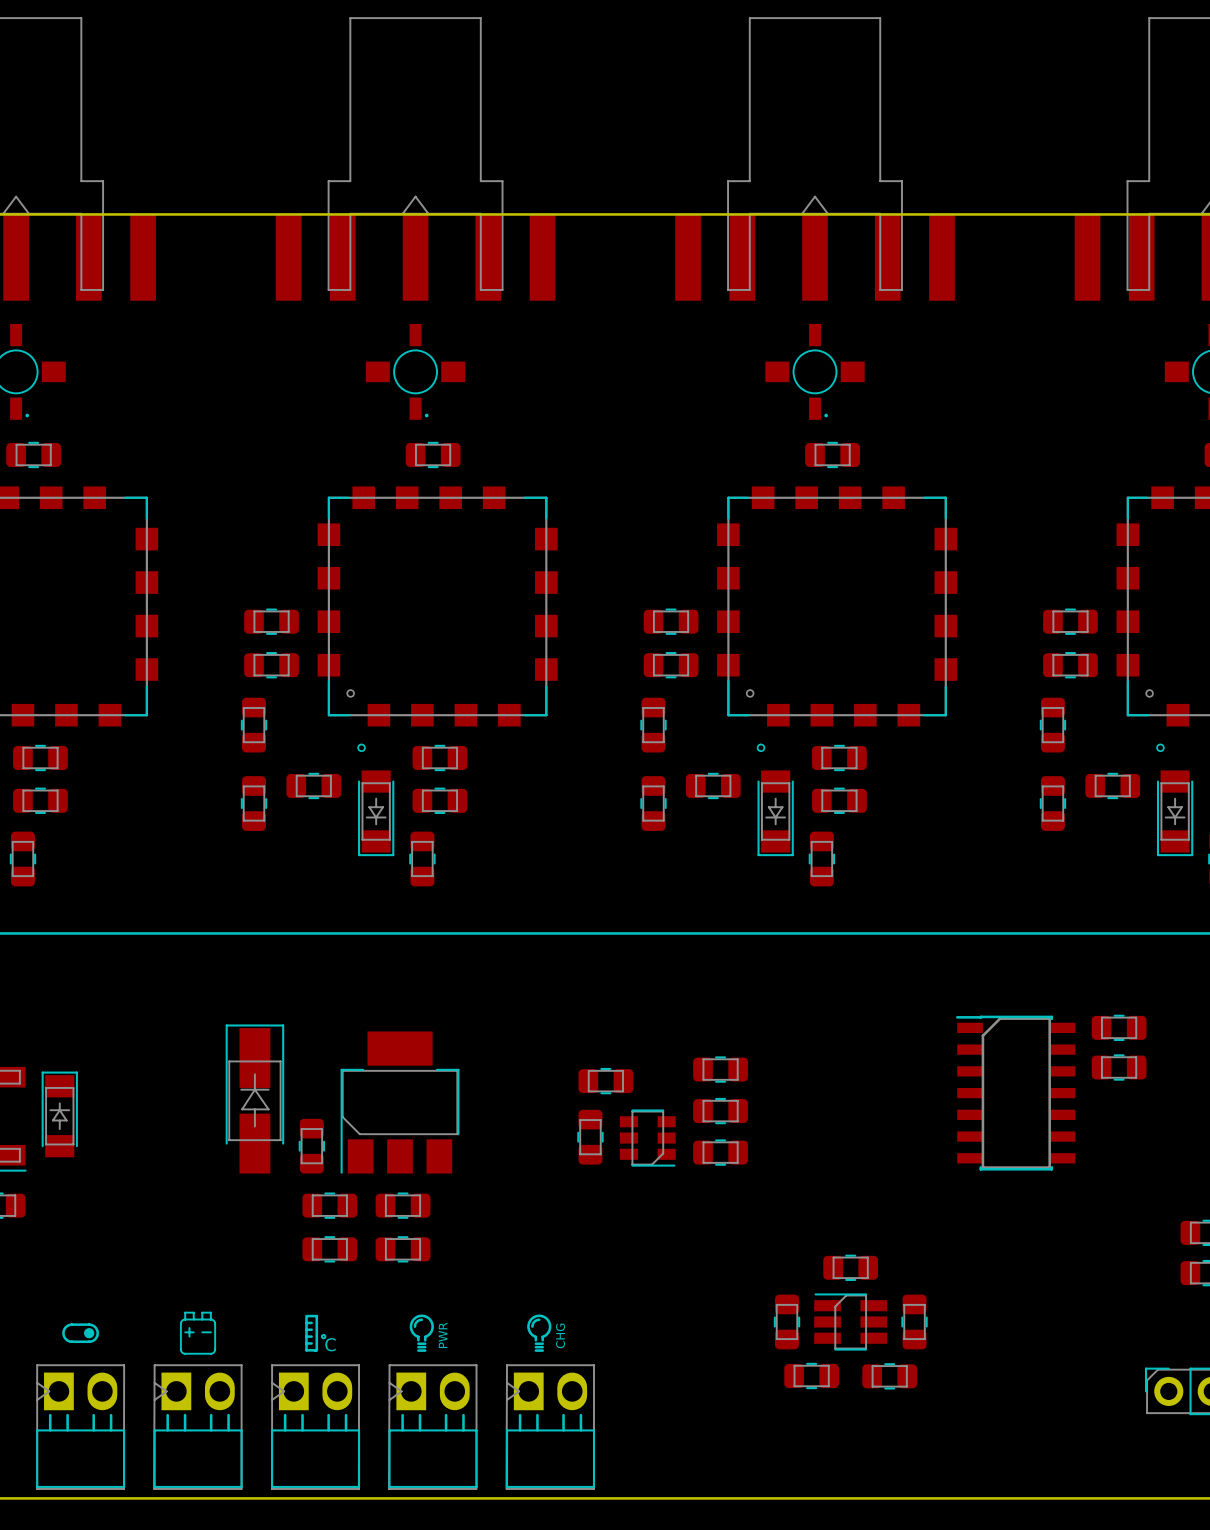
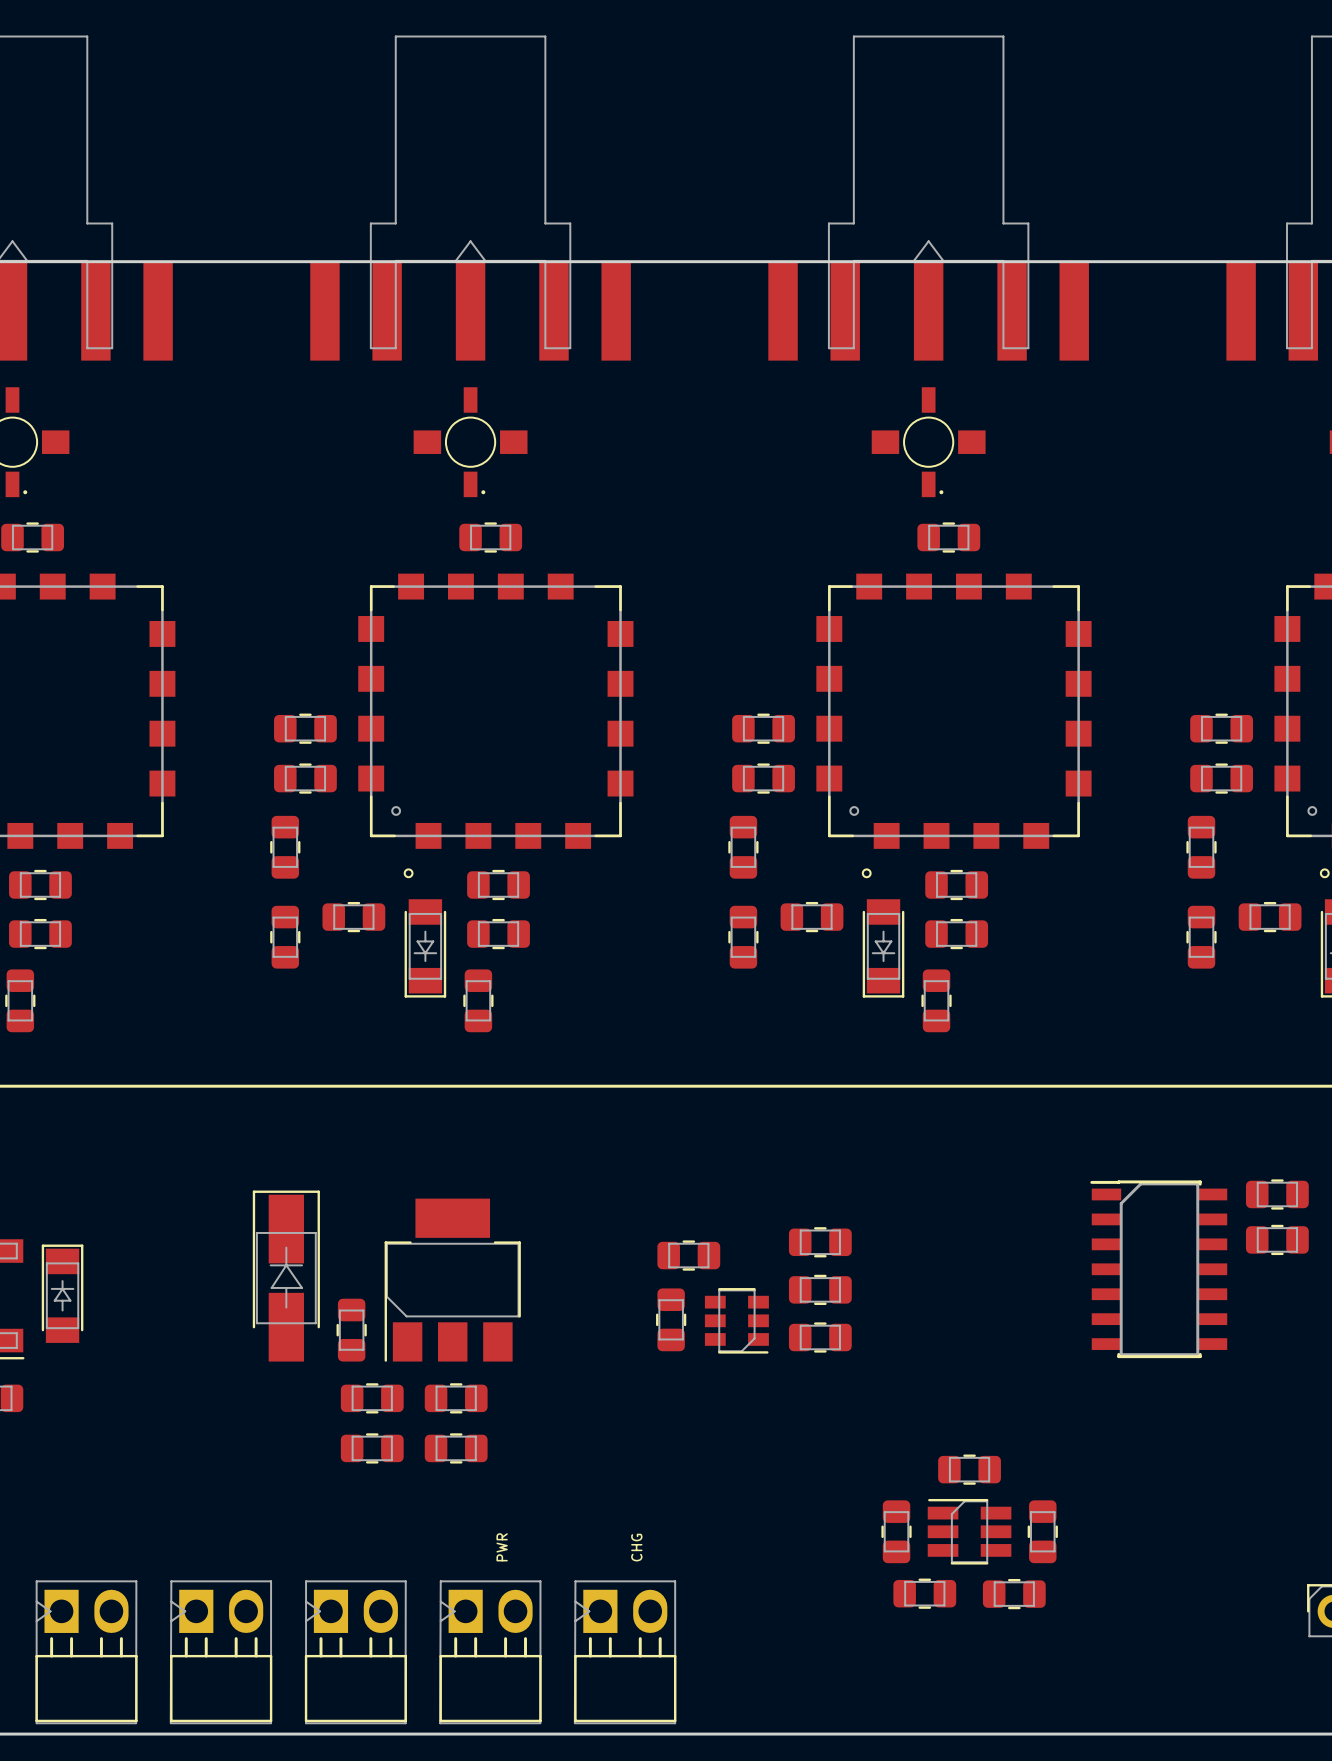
drawing: [180, 1311, 217, 1355] -> none
drawing: [305, 1314, 326, 1352] -> none
drawing: [409, 1314, 434, 1352] -> none
drawing: [527, 1314, 552, 1352] -> none
drawing: [62, 1323, 99, 1344] -> none

